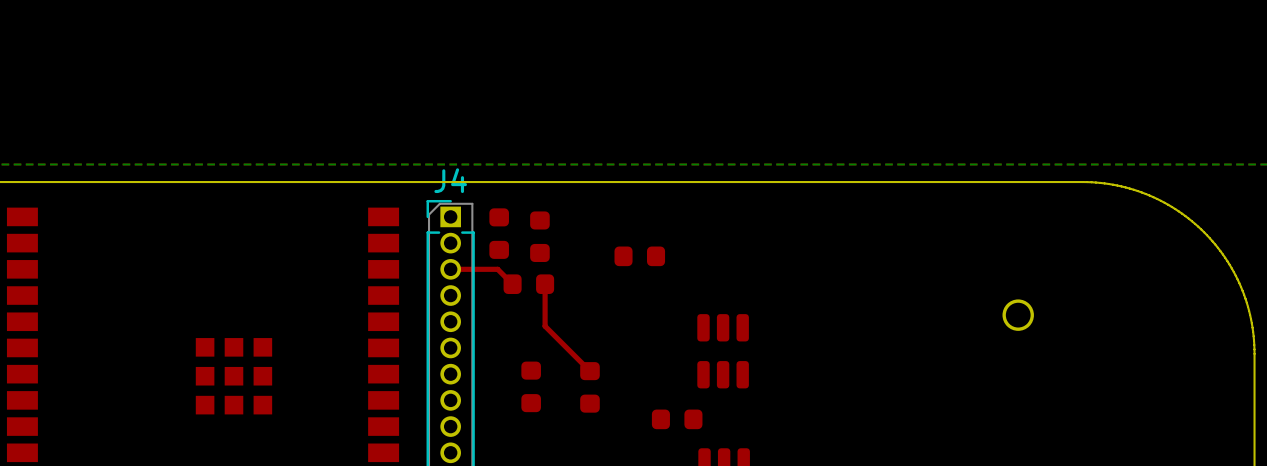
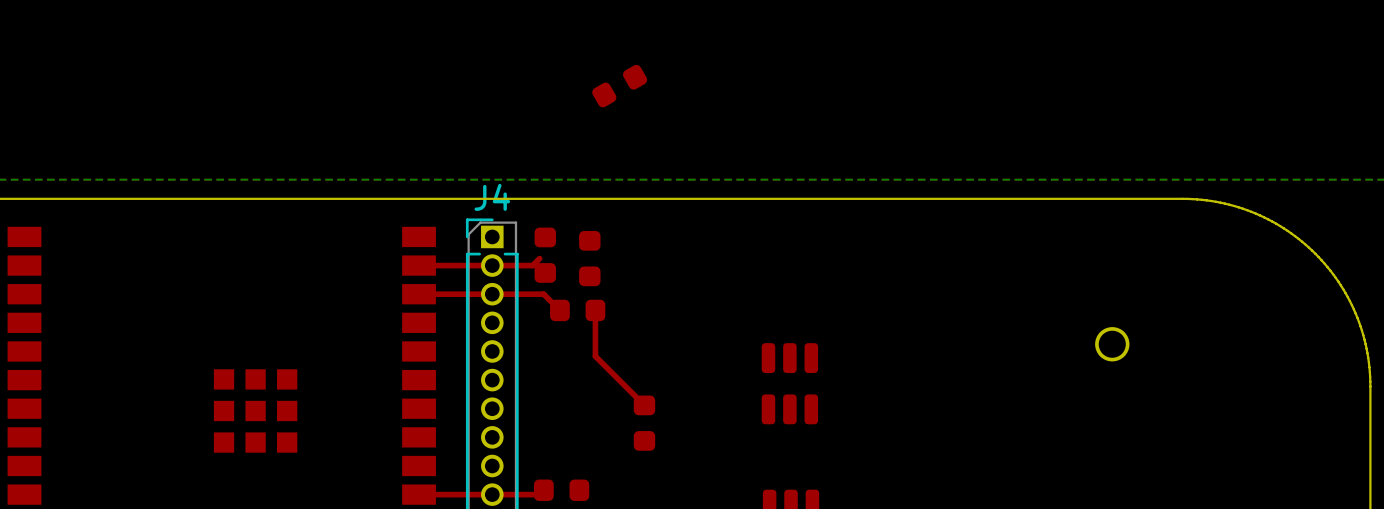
part: none -> (619, 86)
top track: none -> (539, 258) (532, 265) (419, 265)
part: (639, 256) -> none
top track: none -> (492, 294) (419, 294)
part: (531, 386) -> none
part: (677, 419) -> none
top track: none -> (543, 490) (539, 494) (419, 494)
part: none -> (561, 490)

